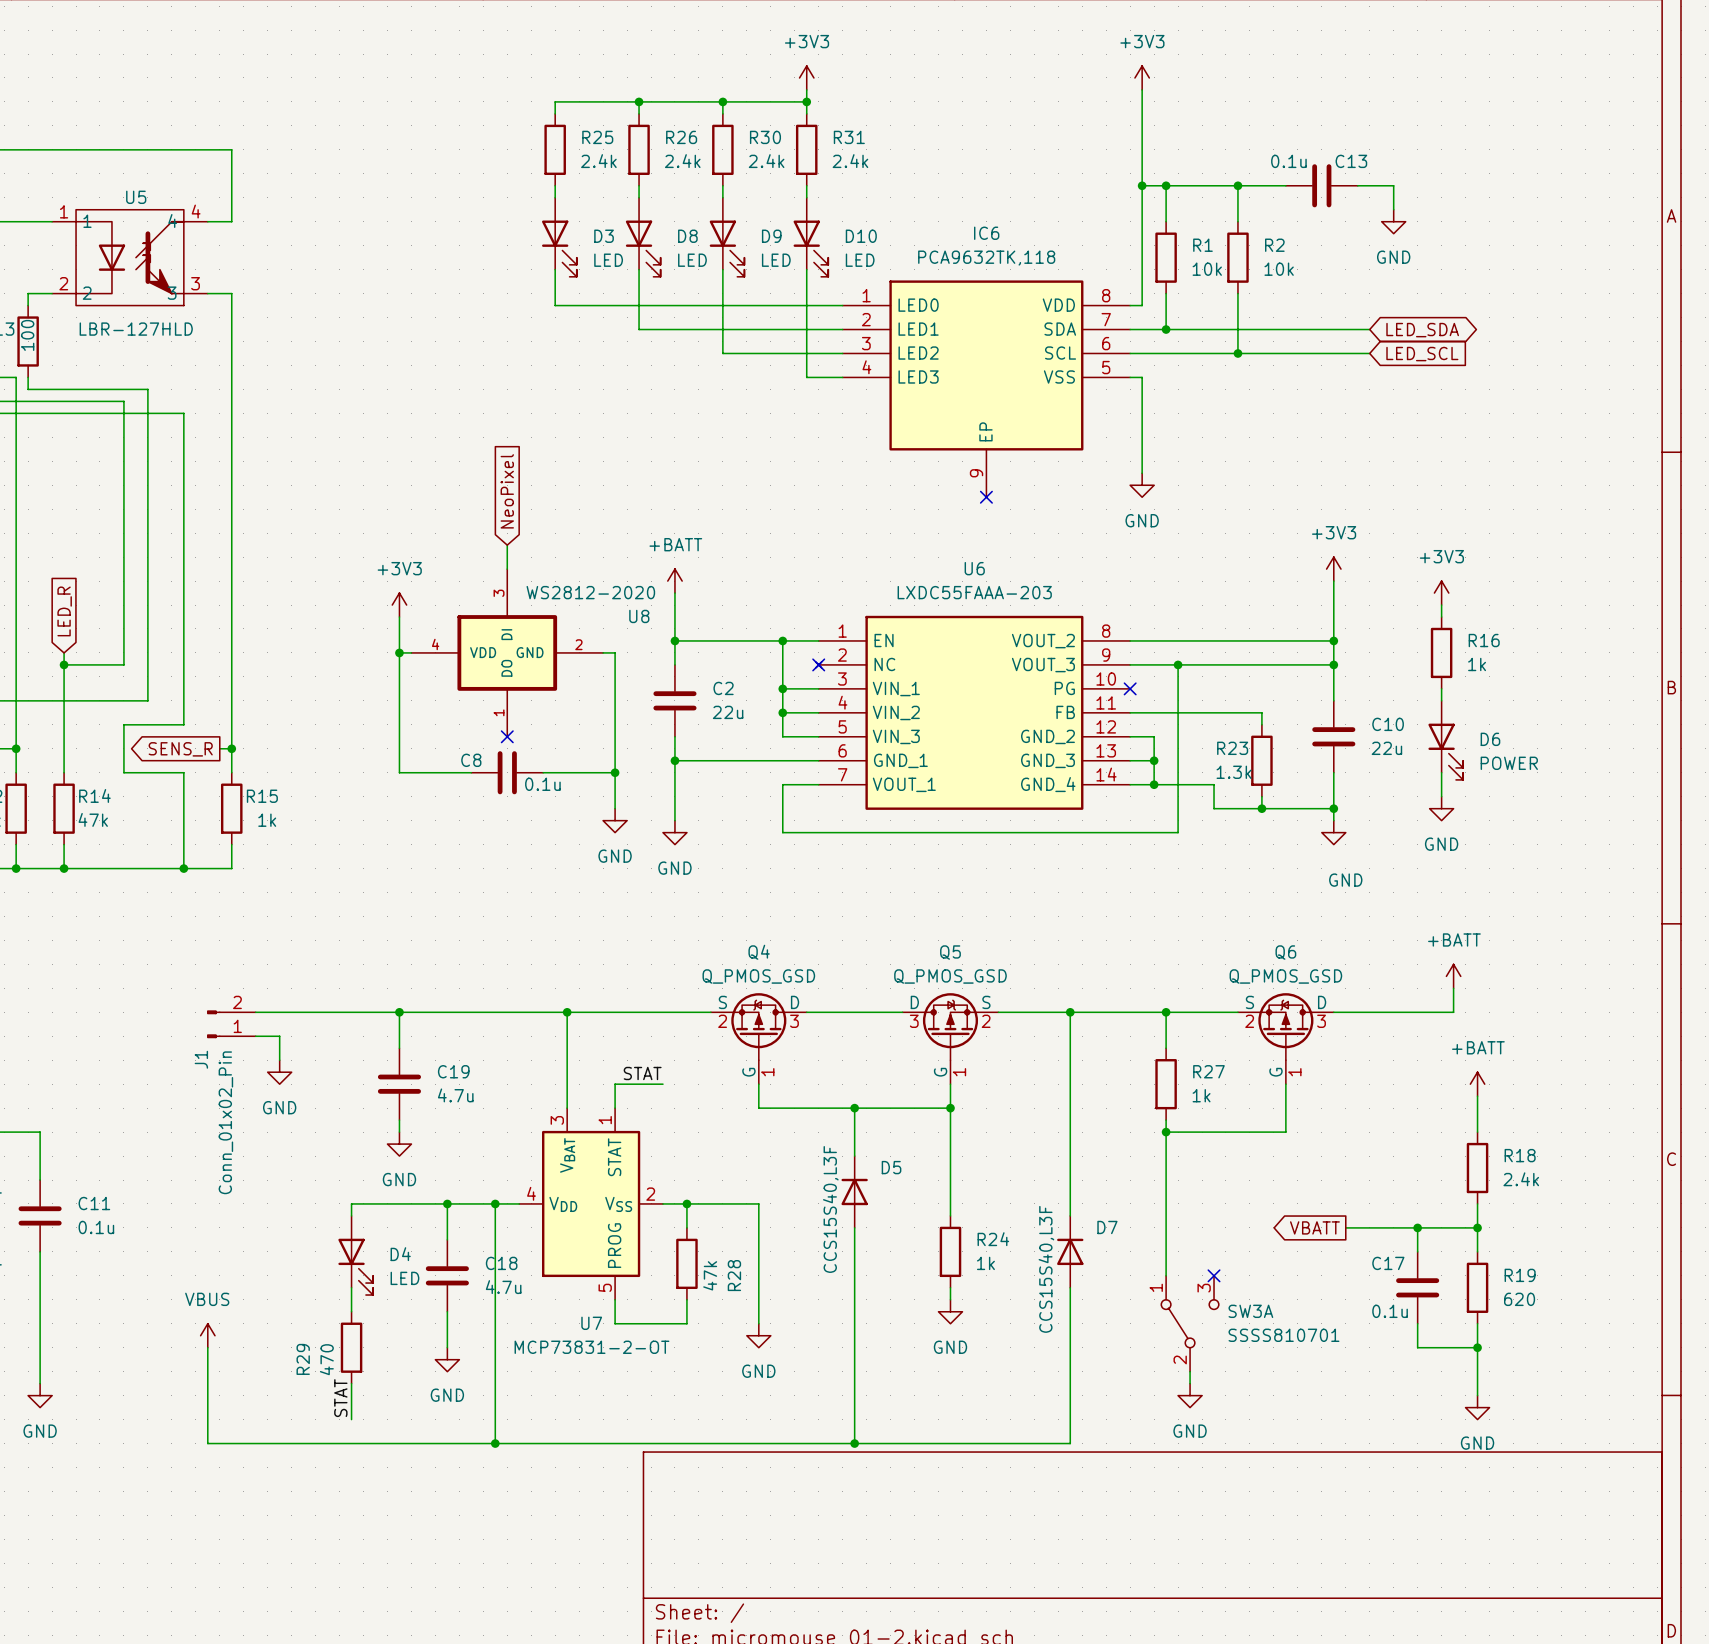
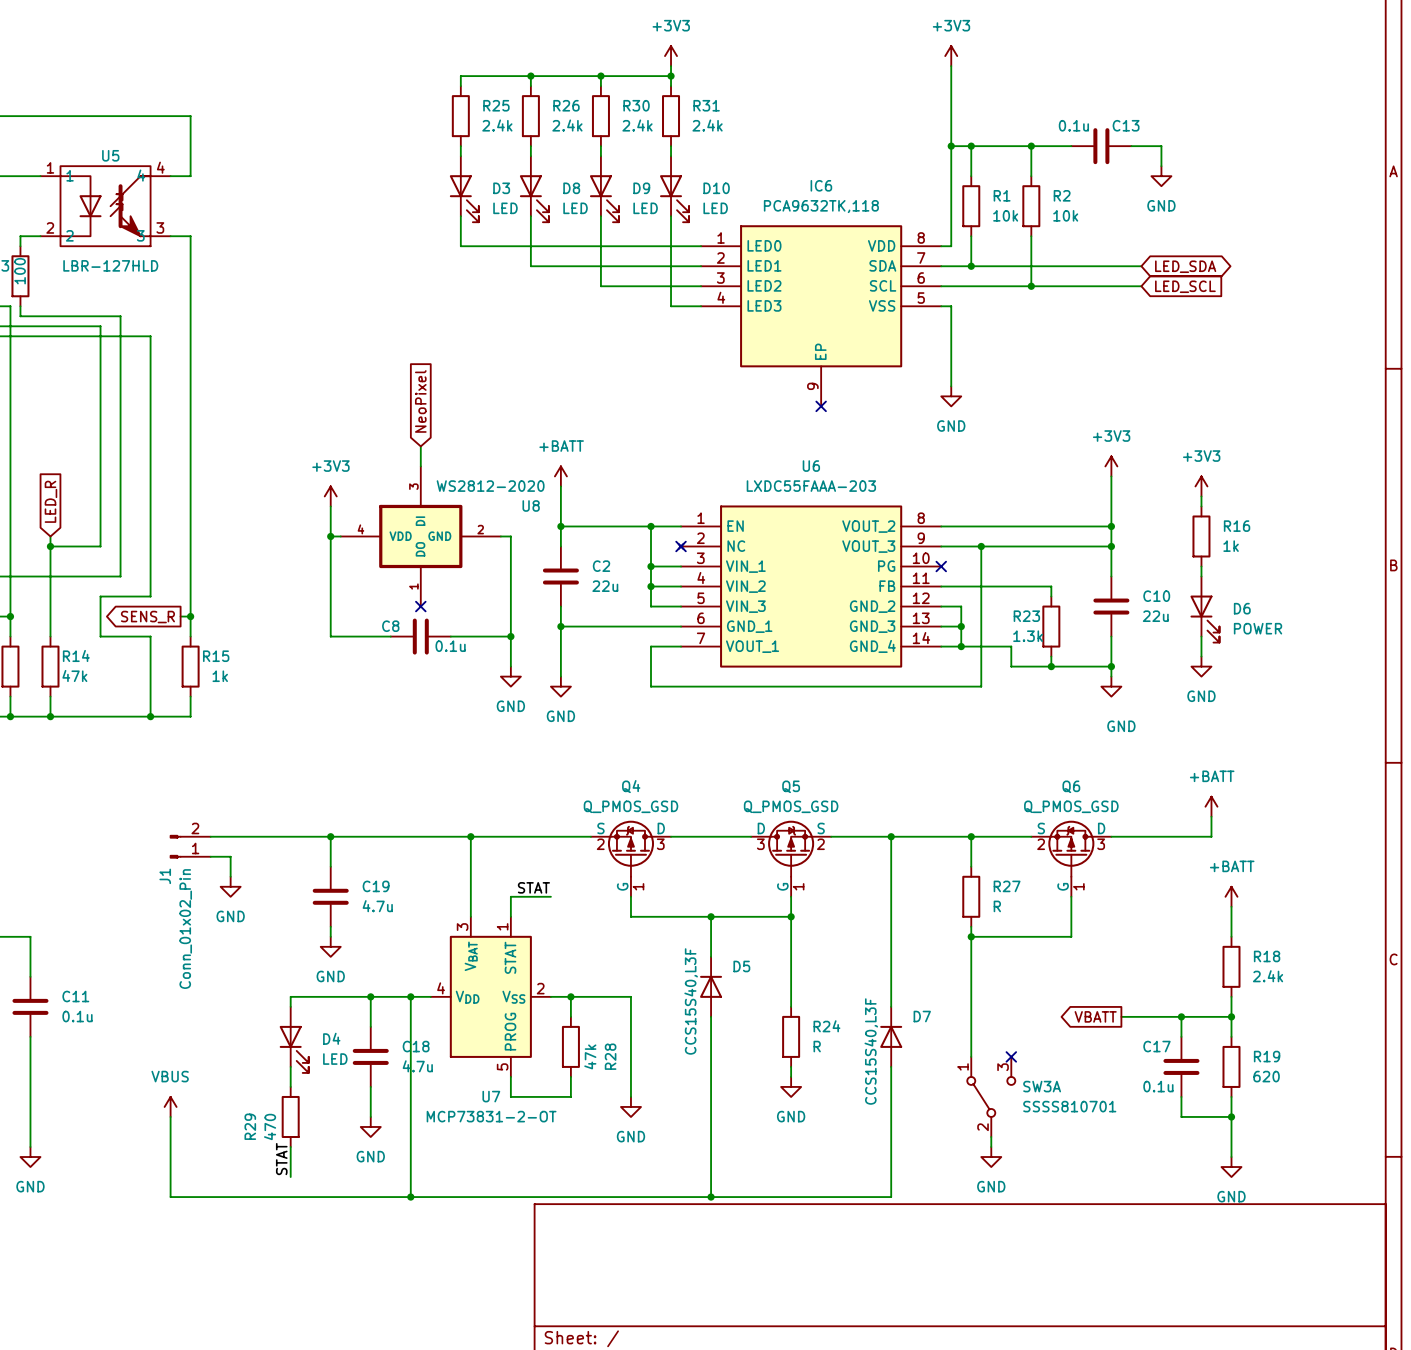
R27 value: 1k (1201, 1095) -> R (997, 906)
R24 value: 1k (985, 1263) -> R (817, 1046)

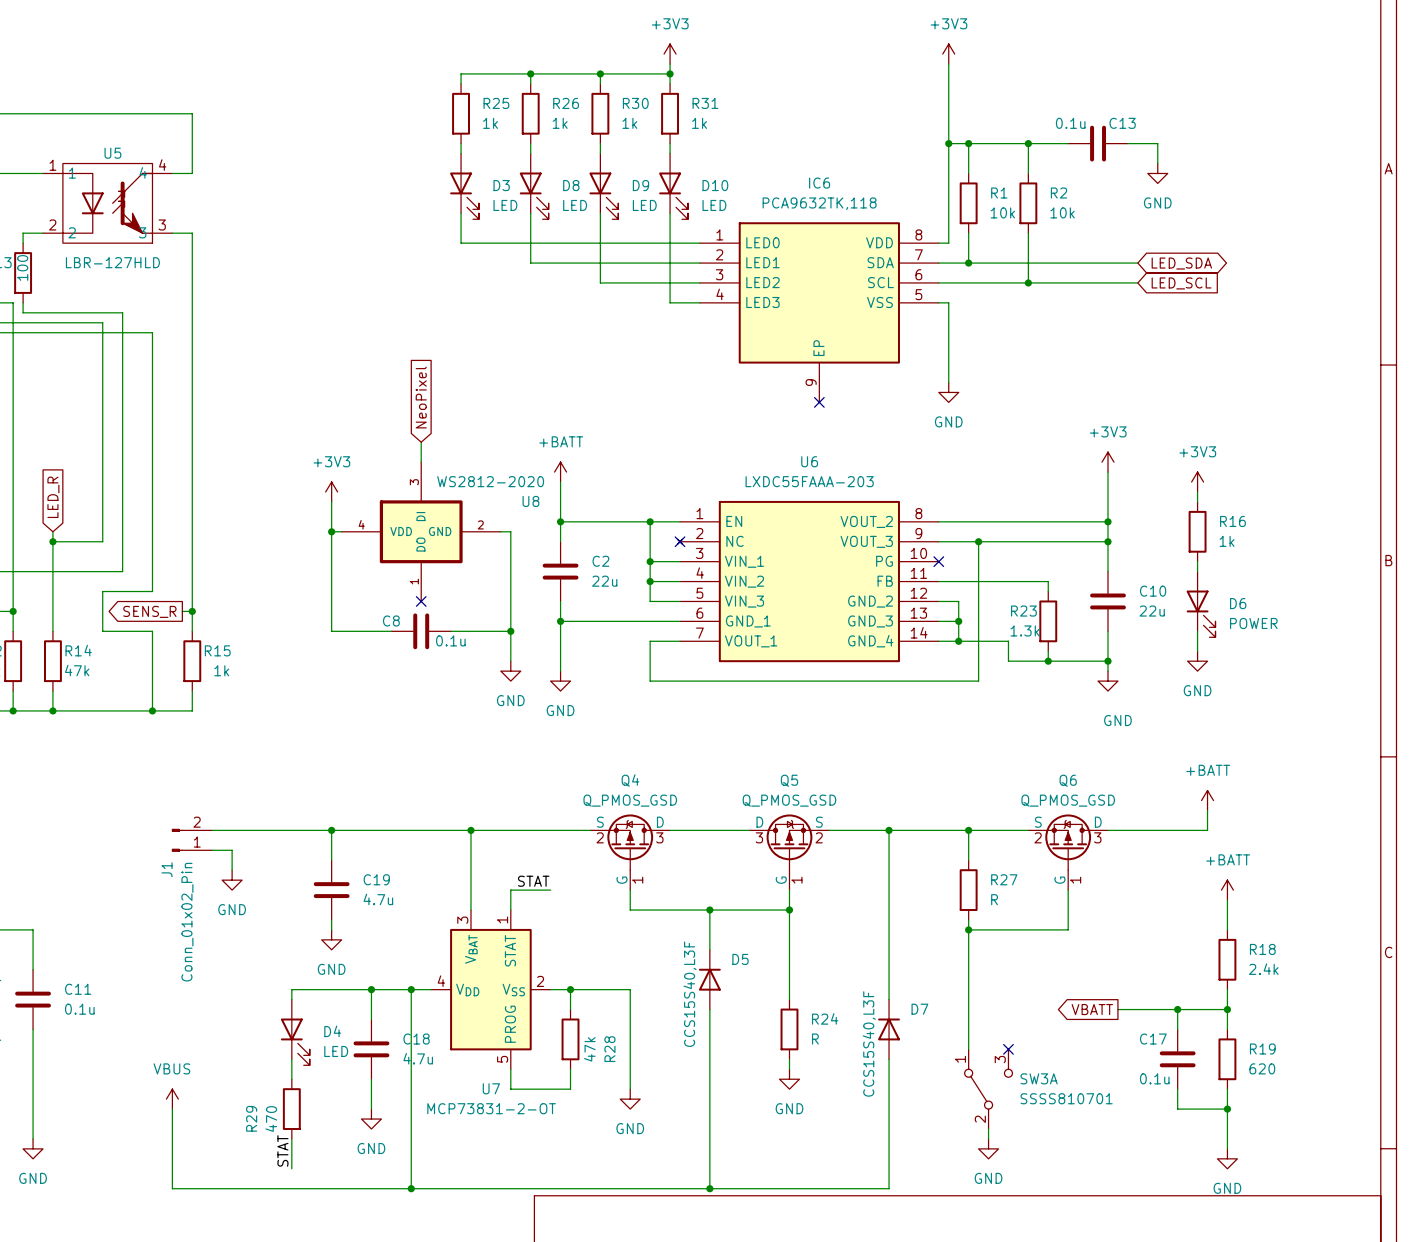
R25 value: 2.4k (497, 125) -> 1k (490, 123)
R26 value: 2.4k (567, 125) -> 1k (560, 123)
R30 value: 2.4k (637, 125) -> 1k (629, 123)
R31 value: 2.4k (707, 125) -> 1k (699, 123)

